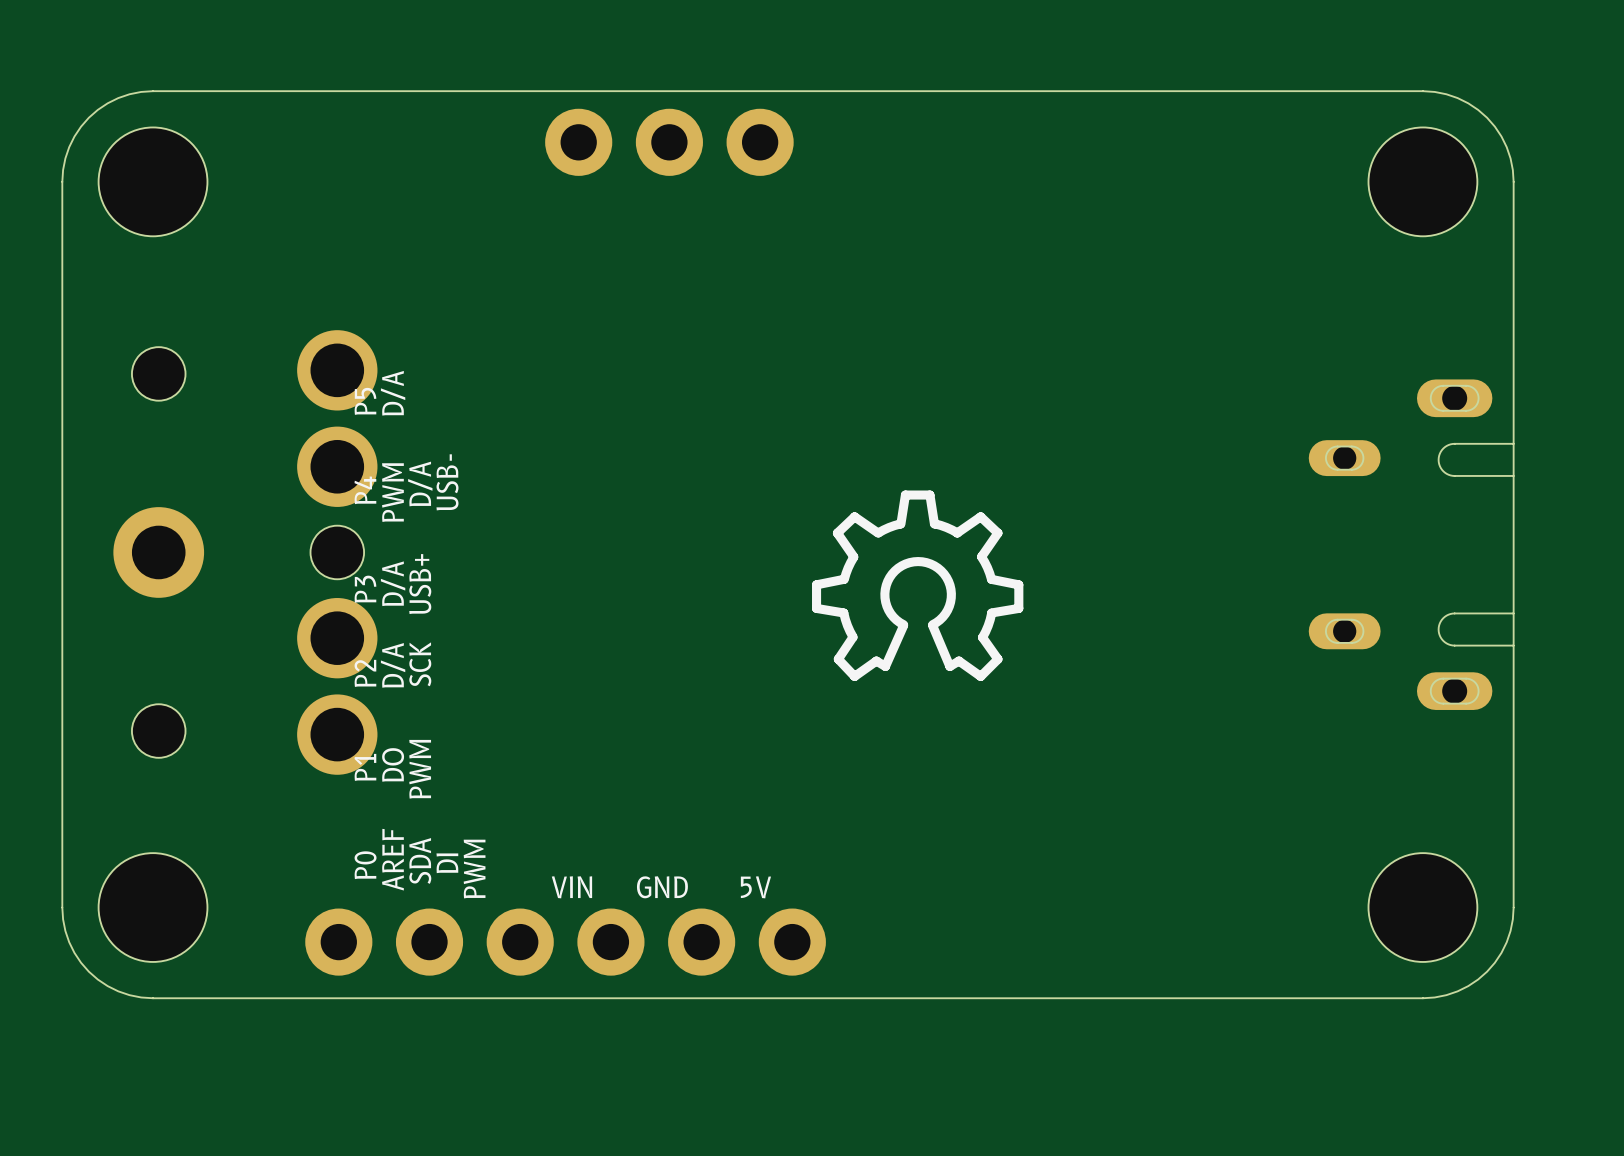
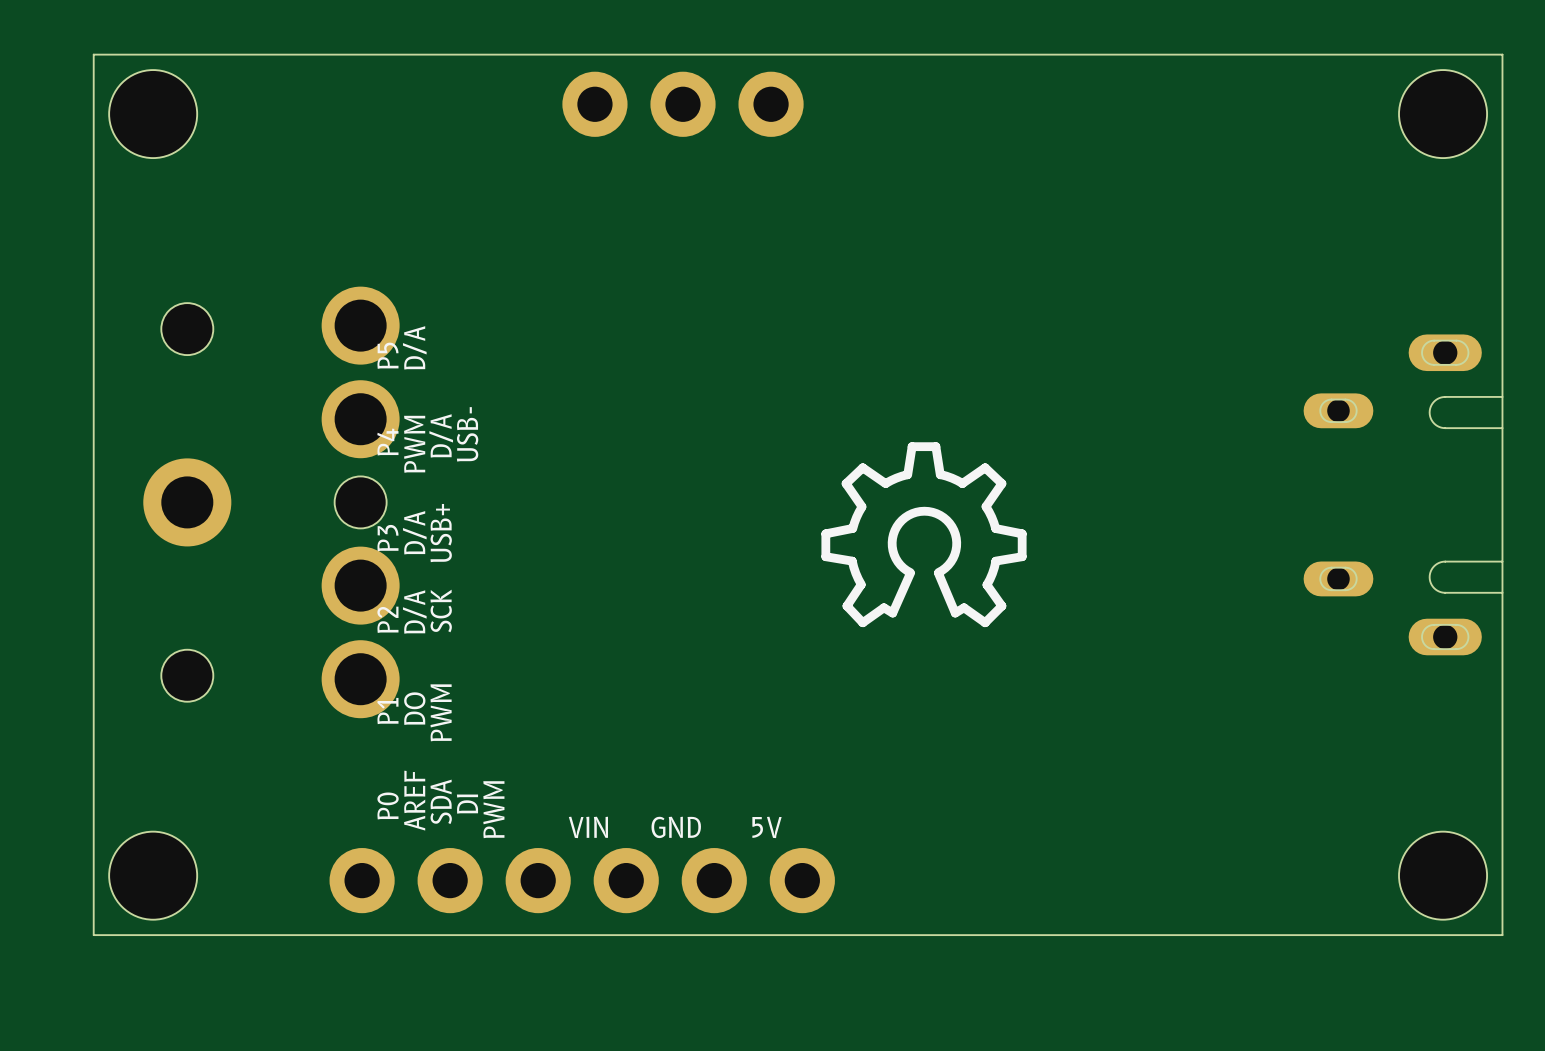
board edge: (153, 91) (129, 94) (118, 98) (97, 109) (88, 117) (81, 126) (69, 147) (65, 158) (62, 181) -> (181, 54) (93, 54) (93, 142)
board edge: (1422, 91) (1446, 94) (1457, 98) (1478, 109) (1487, 117) (1494, 126) (1506, 147) (1510, 158) (1513, 181) -> (1414, 54) (1502, 54) (1502, 142)
hole: none -> (153, 114)
hole: none -> (1443, 114)
hole: (153, 181) -> none
hole: (1422, 181) -> none
board edge: (62, 907) (65, 931) (69, 942) (81, 962) (88, 971) (97, 979) (118, 991) (129, 995) (153, 998) -> (93, 847) (93, 935) (181, 935)
hole: (153, 907) -> none
hole: (1422, 907) -> none
board edge: (1513, 907) (1510, 931) (1506, 942) (1494, 962) (1487, 971) (1478, 979) (1457, 991) (1446, 995) (1422, 998) -> (1502, 847) (1502, 935) (1414, 935)
hole: none -> (153, 875)
hole: none -> (1443, 875)

